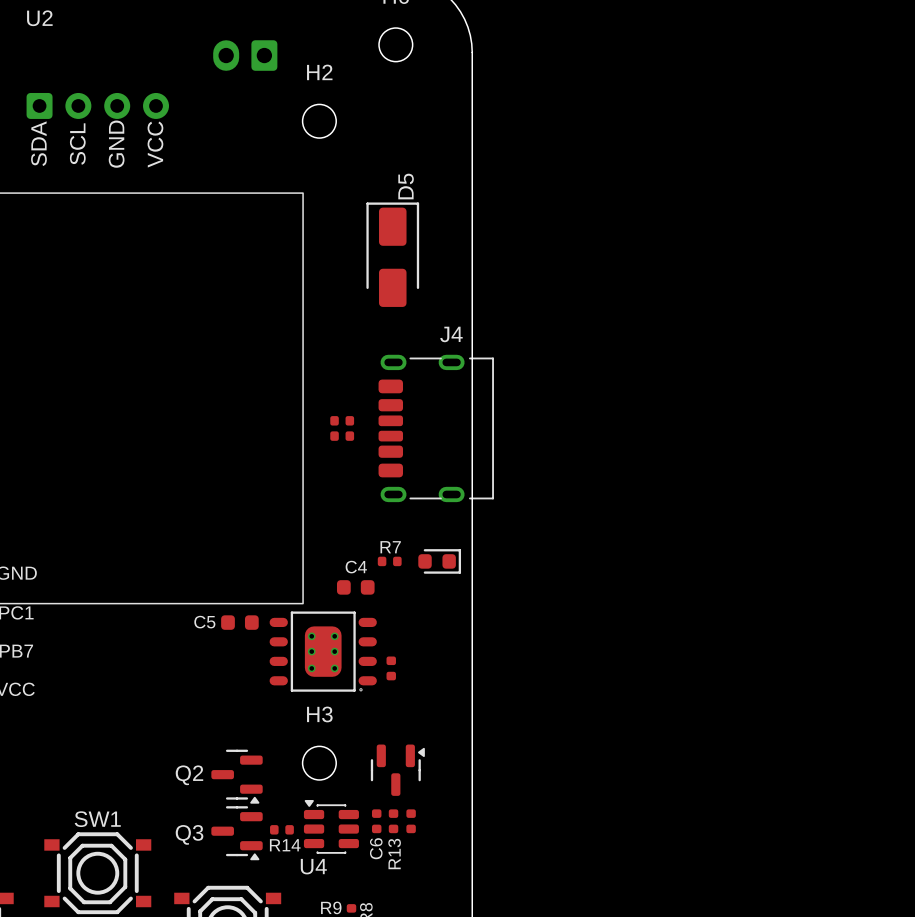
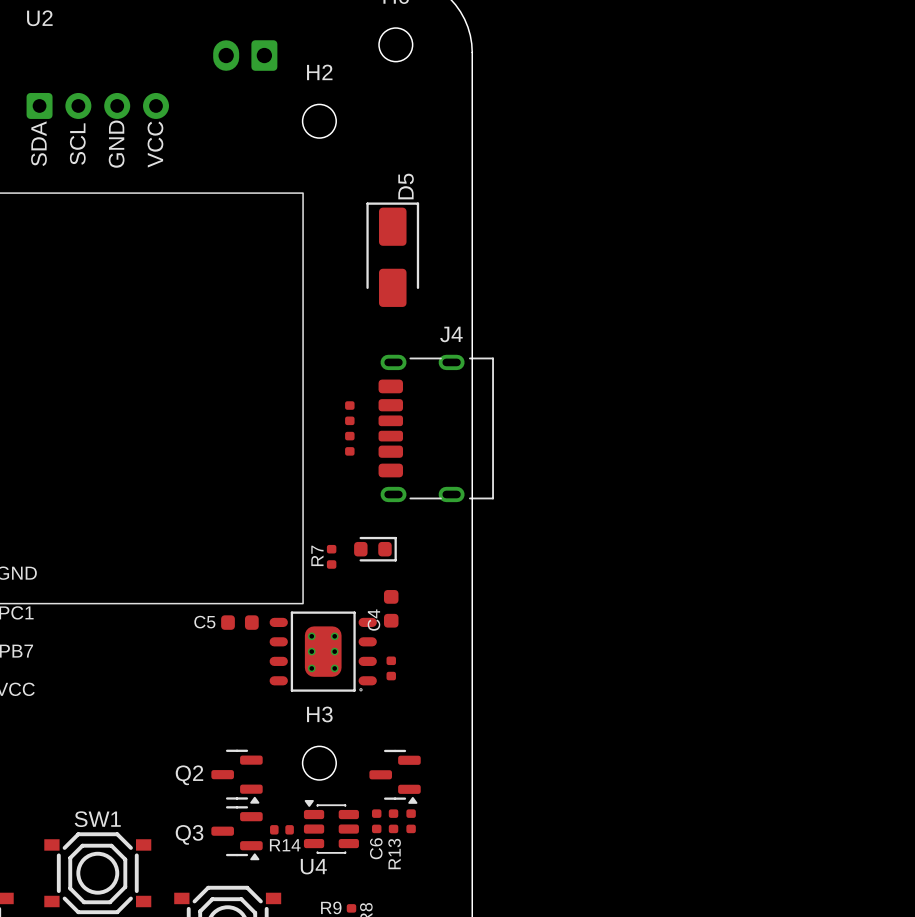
part rotation: 0° (342, 420) -> 90° clockwise (349, 413)
part rotation: 0° (342, 436) -> 90° clockwise (349, 443)
R7 rotation: 0° (389, 561) -> 90° clockwise (331, 556)
R7 position: (389, 561) -> (331, 556)
part position: (439, 561) -> (375, 549)
C4 name position: C4 (356, 567) -> C4 (373, 620)
C4 rotation: 0° (355, 587) -> 90° clockwise (391, 608)
C4 position: (355, 587) -> (391, 608)
part rotation: 0° (397, 770) -> 90° clockwise (395, 776)

